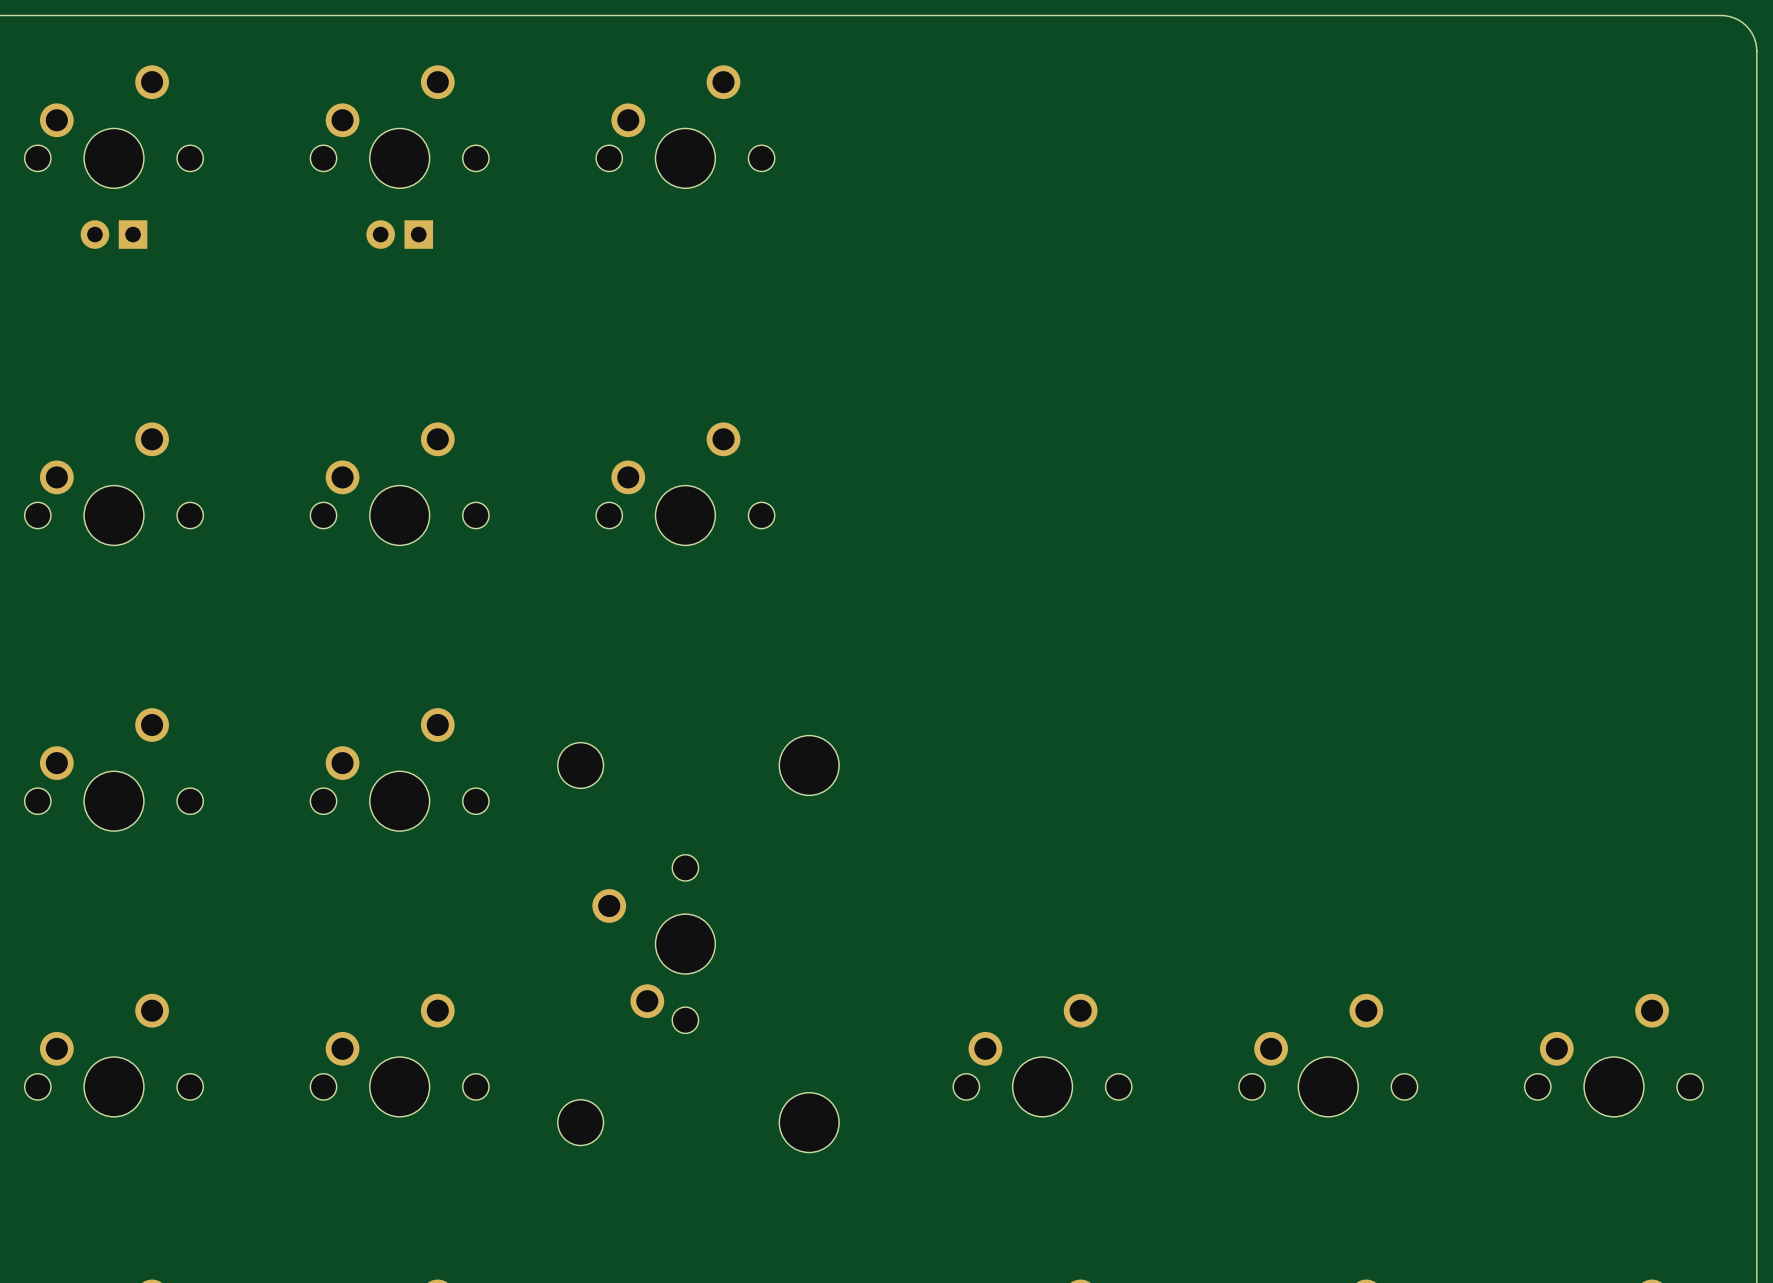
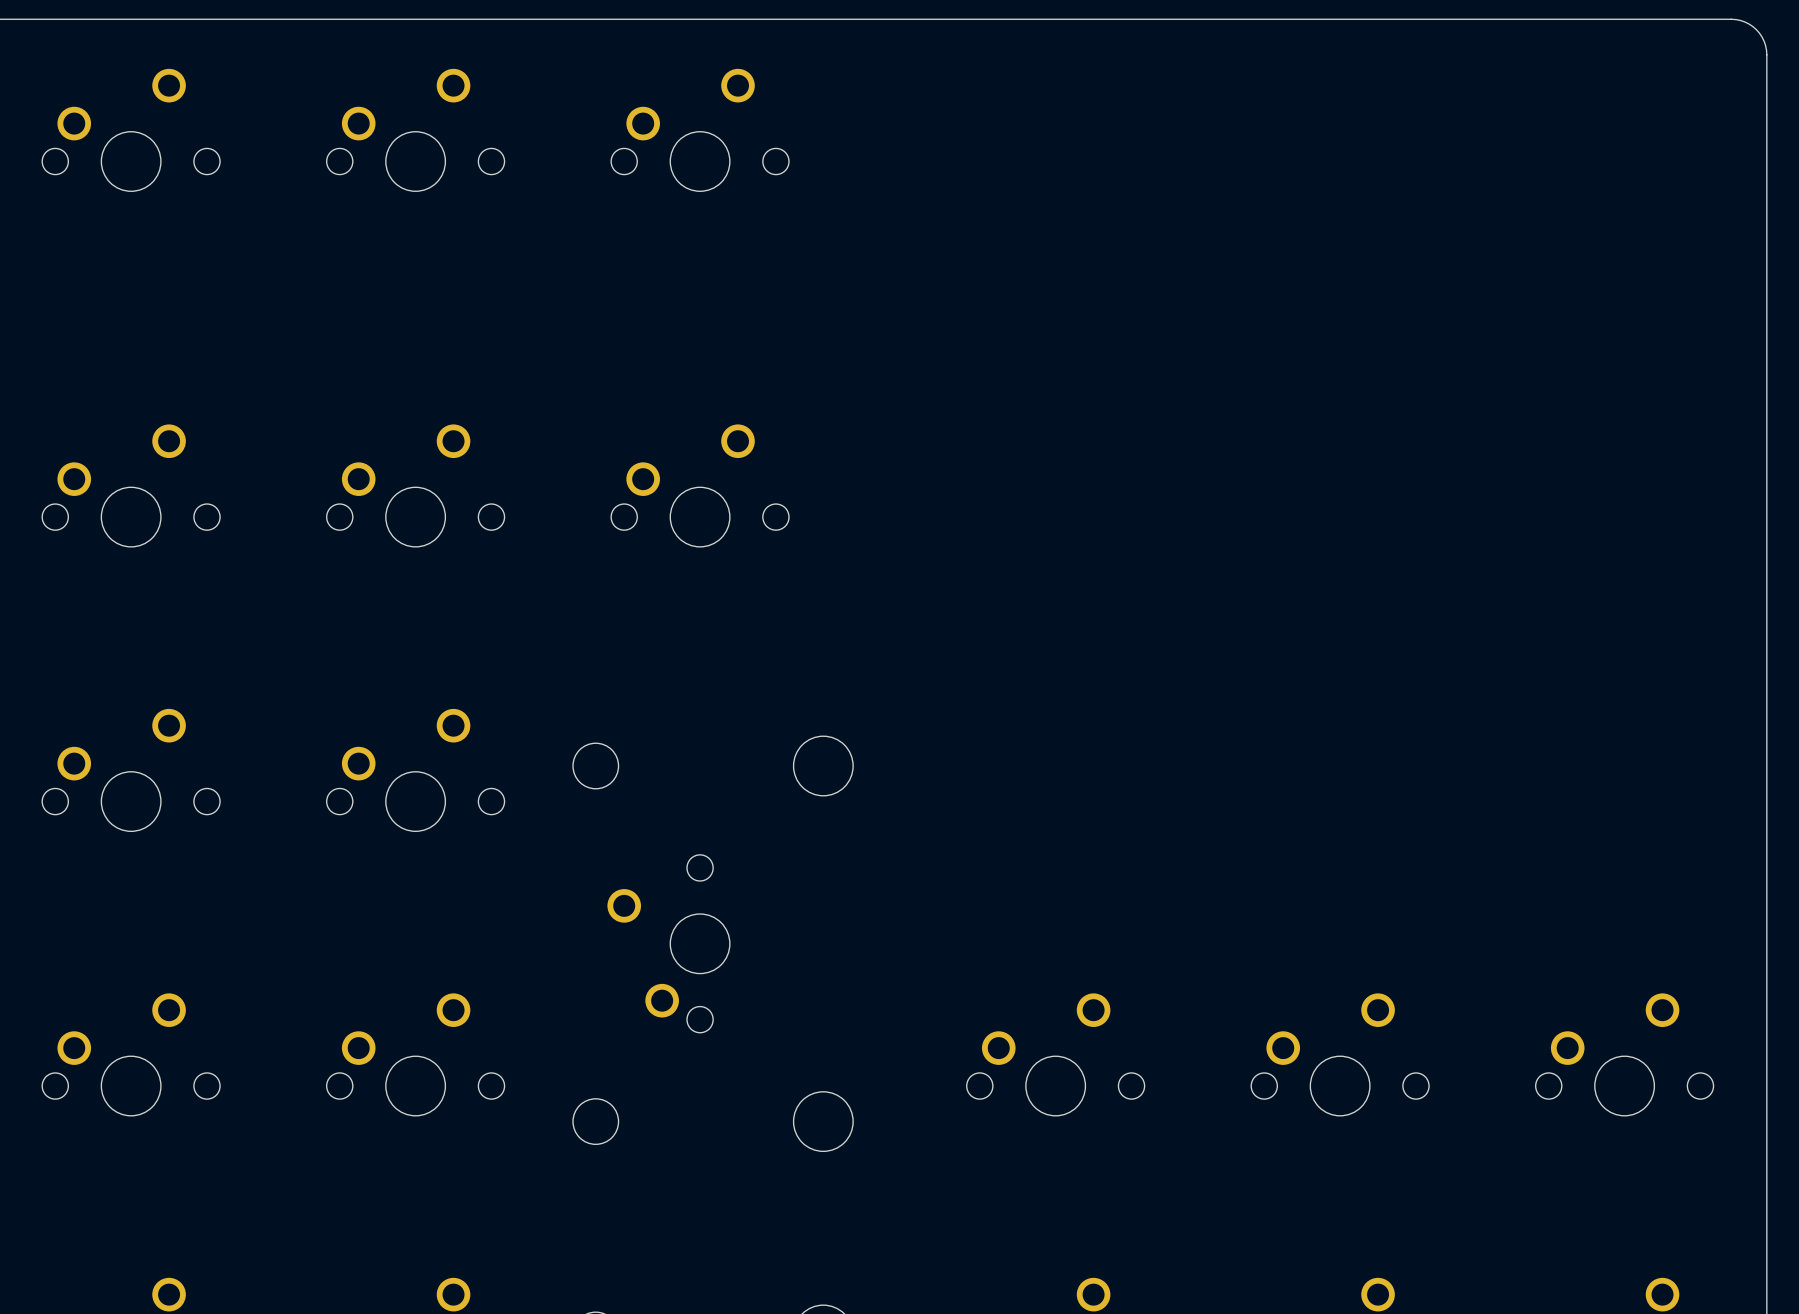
part: (113, 157) -> none
part: (399, 157) -> none

